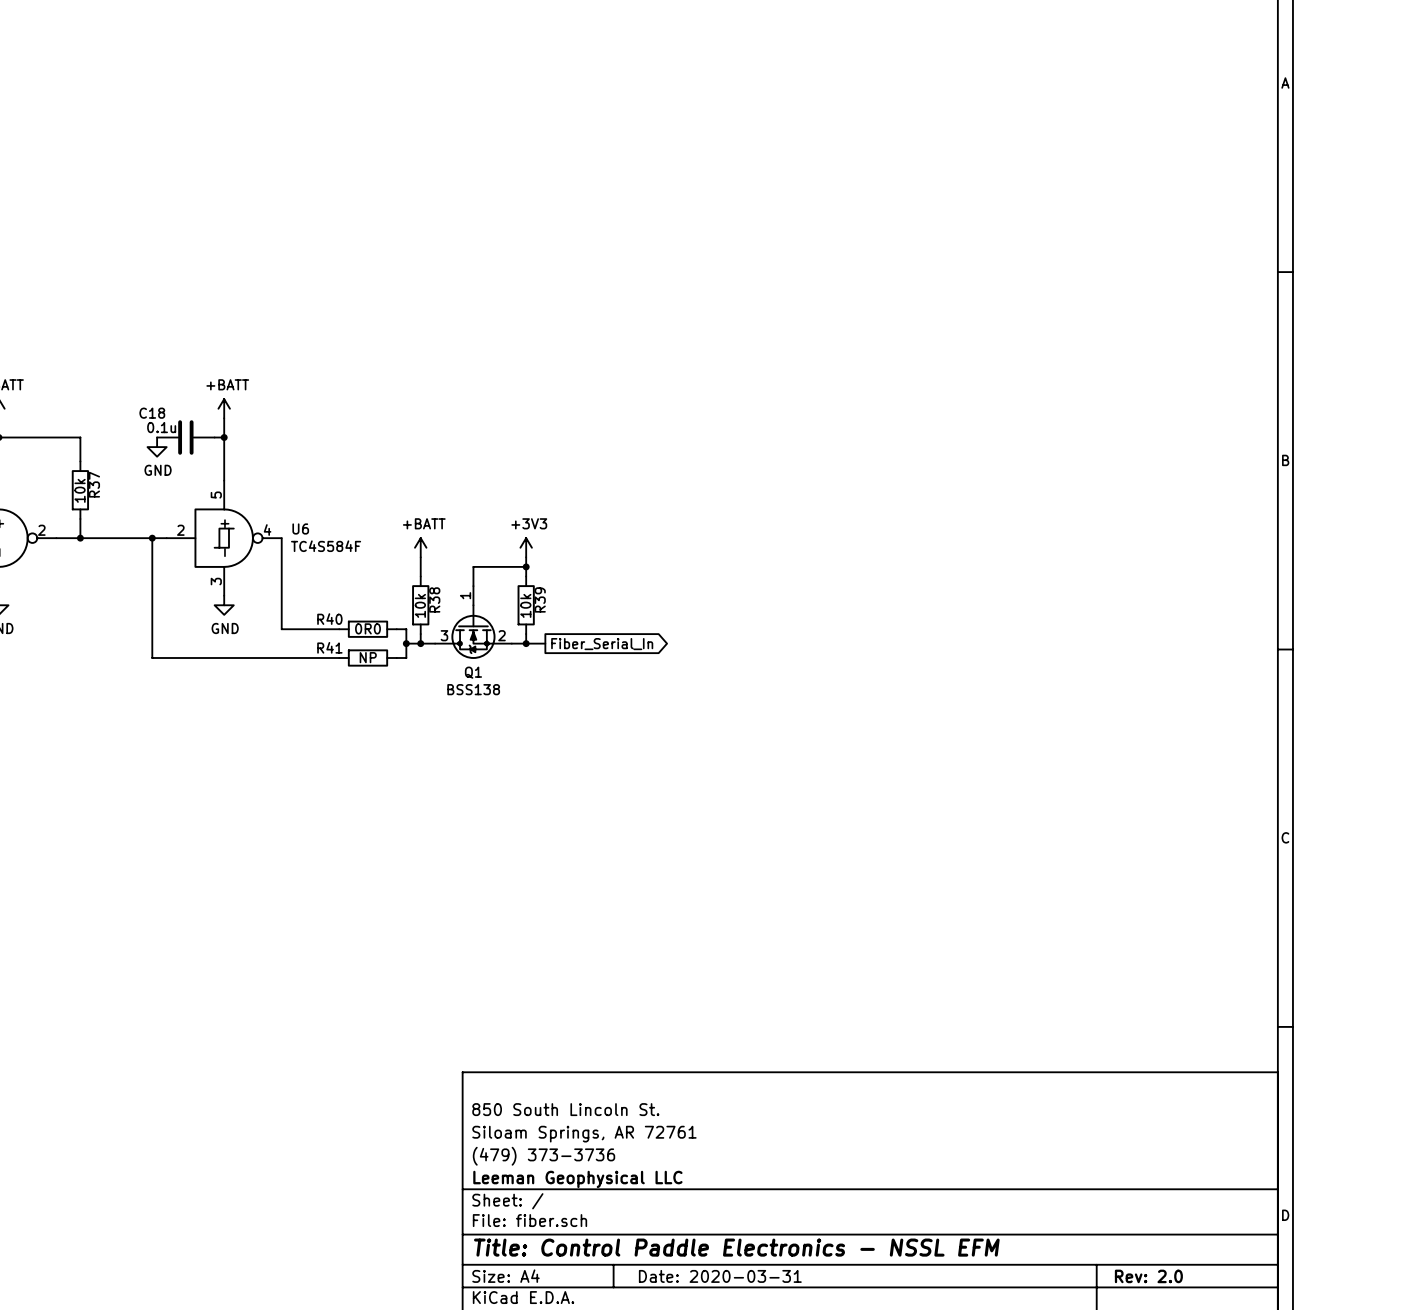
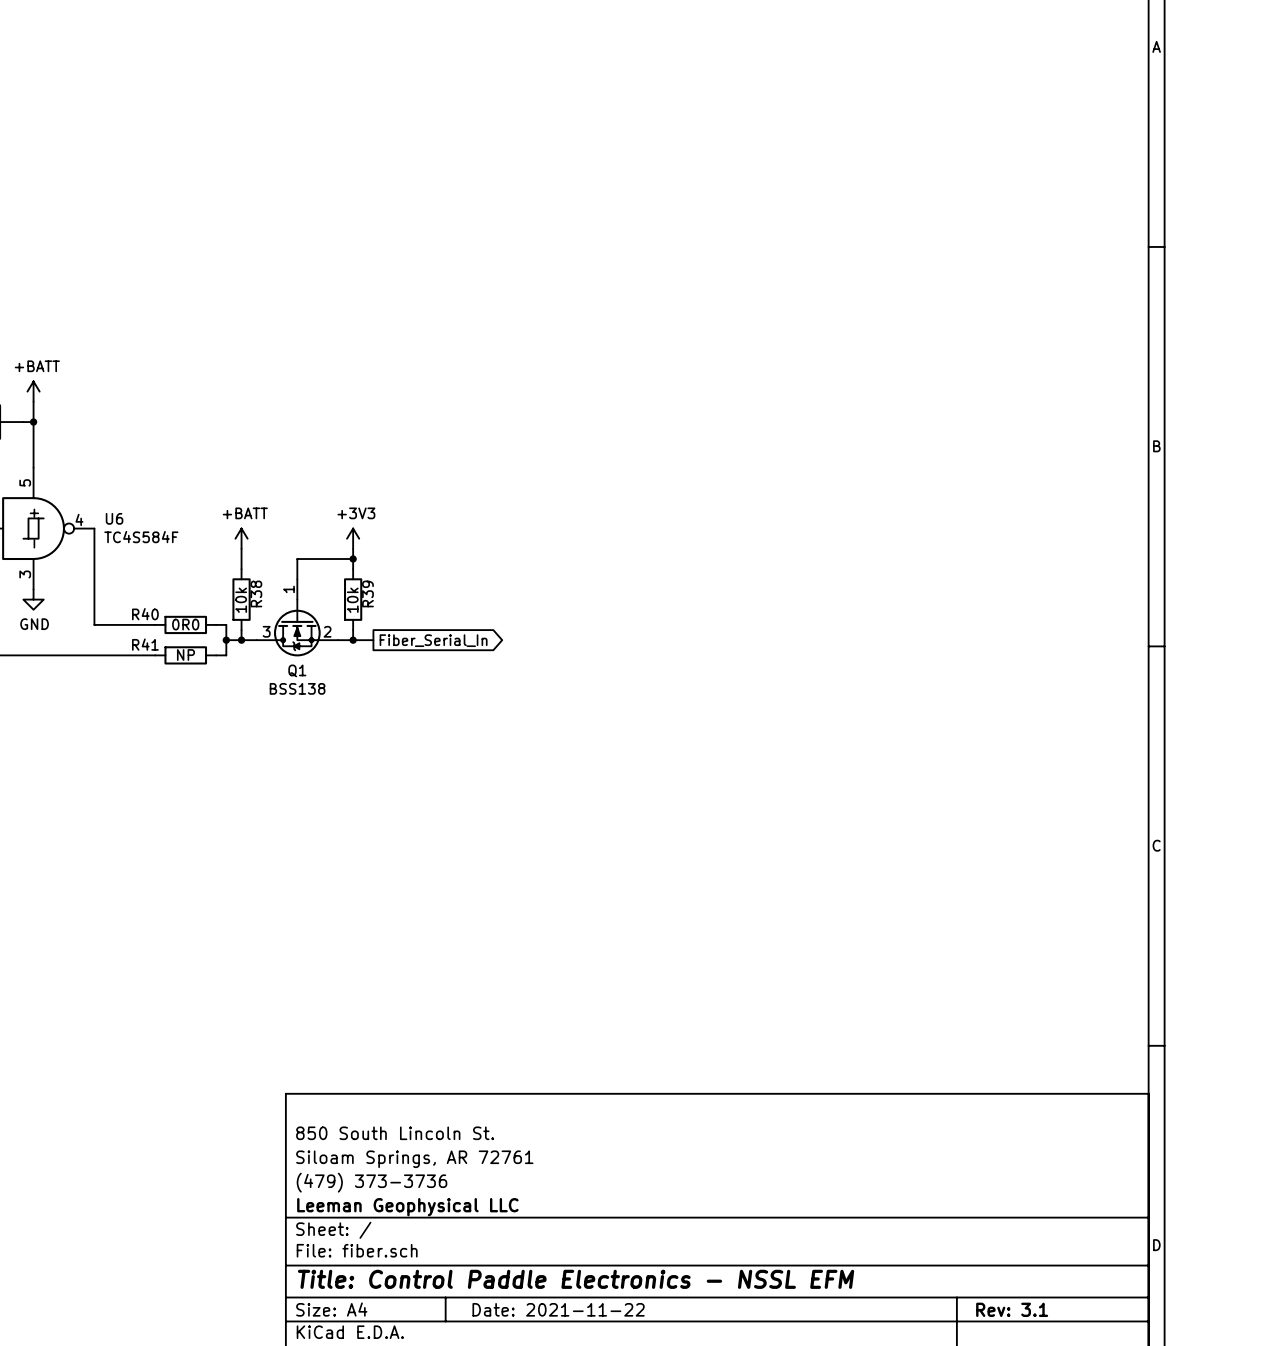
title block: Date: 2020-03-31 (720, 1276) -> Date: 2021-11-22 (558, 1309)
title block: Rev: 2.0 (1148, 1276) -> Rev: 3.1 (1012, 1309)

